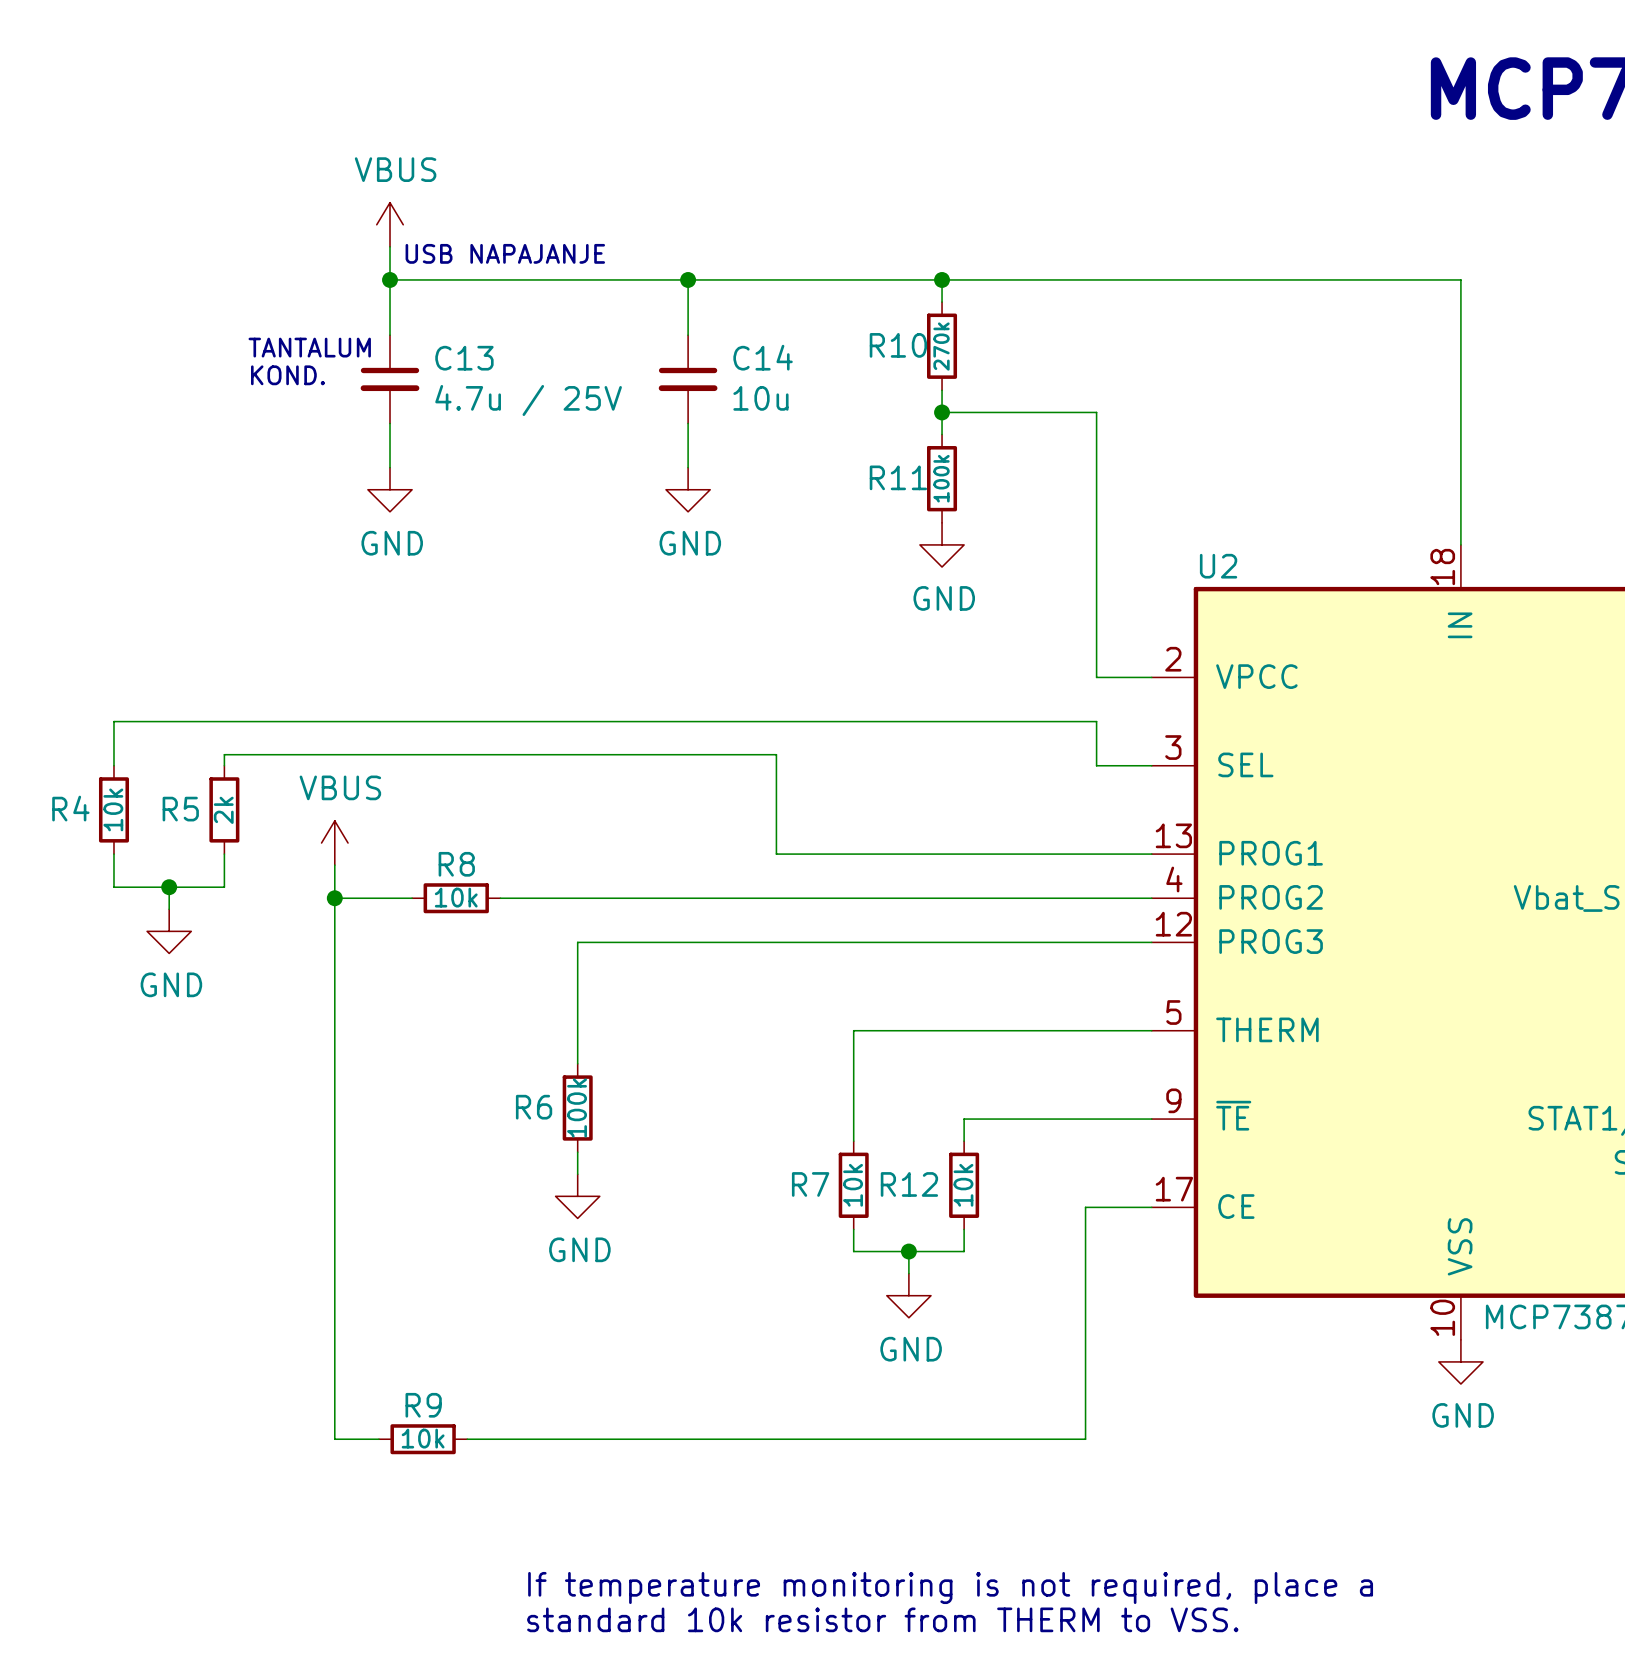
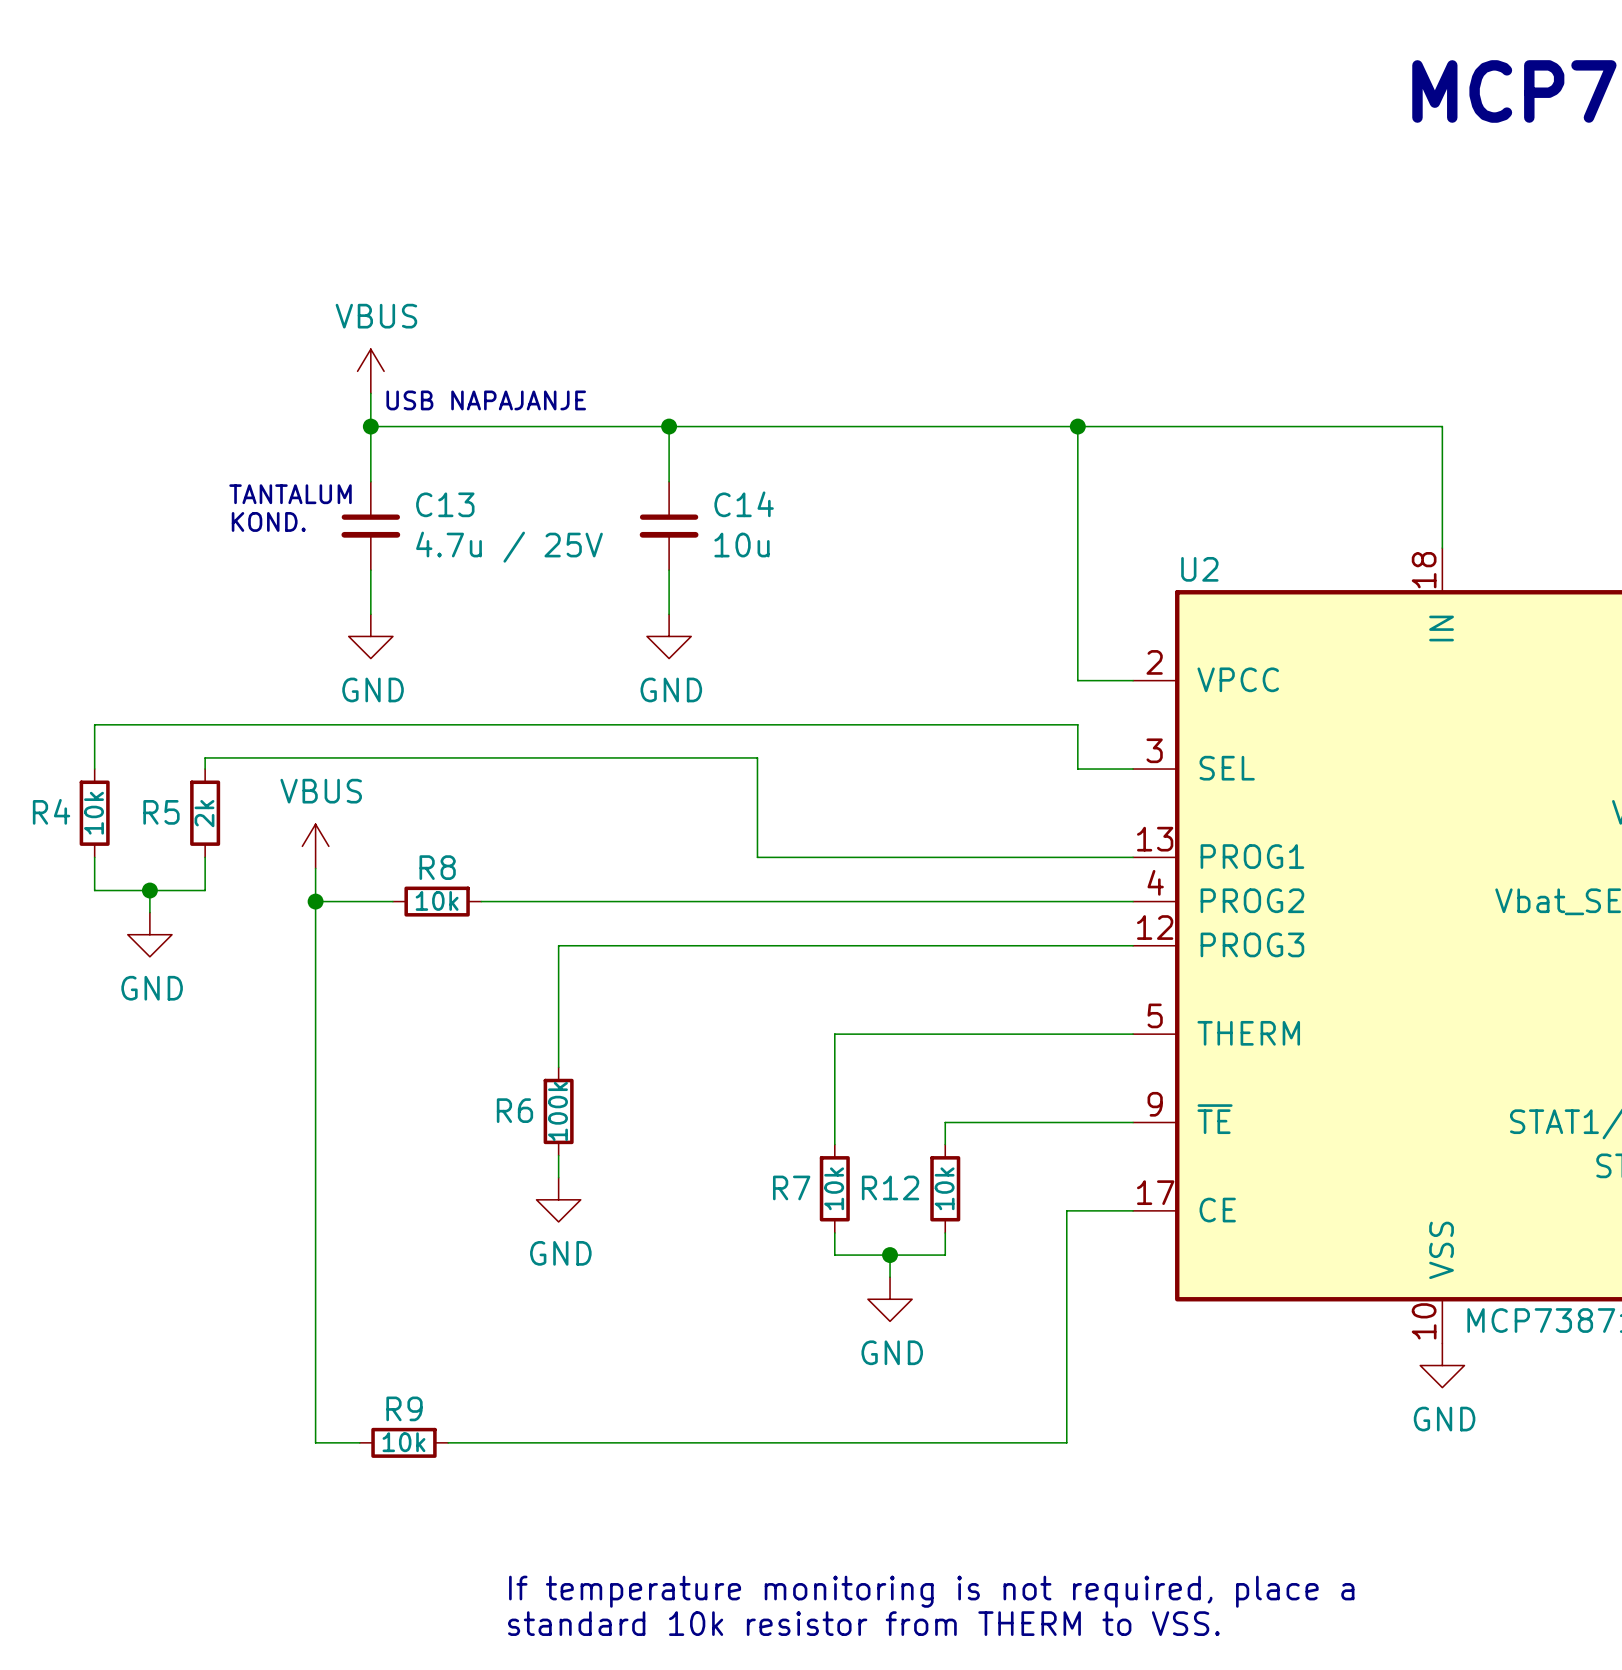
power symbol position: VBUS (390, 224) -> VBUS (370, 371)
wire: (390, 246) (390, 335) -> none
text position: USB NAPAJANJE (505, 253) -> USB NAPAJANJE (486, 400)
wire: (390, 279) (1460, 279) (1460, 423) -> (370, 393) (370, 426) (1442, 426)
junction: (390, 279) -> none
wire: (688, 279) (688, 335) -> none
junction: (688, 279) -> none
wire: (942, 279) (942, 302) -> none
junction: (942, 279) -> none
R10: 270k (942, 346) -> none
text position: TANTALUM (309, 347) -> TANTALUM (290, 494)
text position: KOND. (287, 375) -> KOND. (268, 521)
C13 position: (390, 379) -> (370, 525)
C14 position: (688, 379) -> (669, 525)
wire: (942, 390) (942, 434) -> (669, 570) (669, 614)
wire: (942, 412) (1096, 412) (1096, 423) -> none
junction: (942, 412) -> none
junction: none -> (370, 426)
junction: none -> (669, 426)
junction: none -> (1077, 426)
R11: 100k (942, 478) -> none
power symbol position: GND (390, 489) -> GND (370, 636)
power symbol: GND (688, 489) -> none
power symbol: GND (942, 544) -> none
wire: none -> (370, 570) (370, 614)
power symbol: none -> GND (669, 636)

